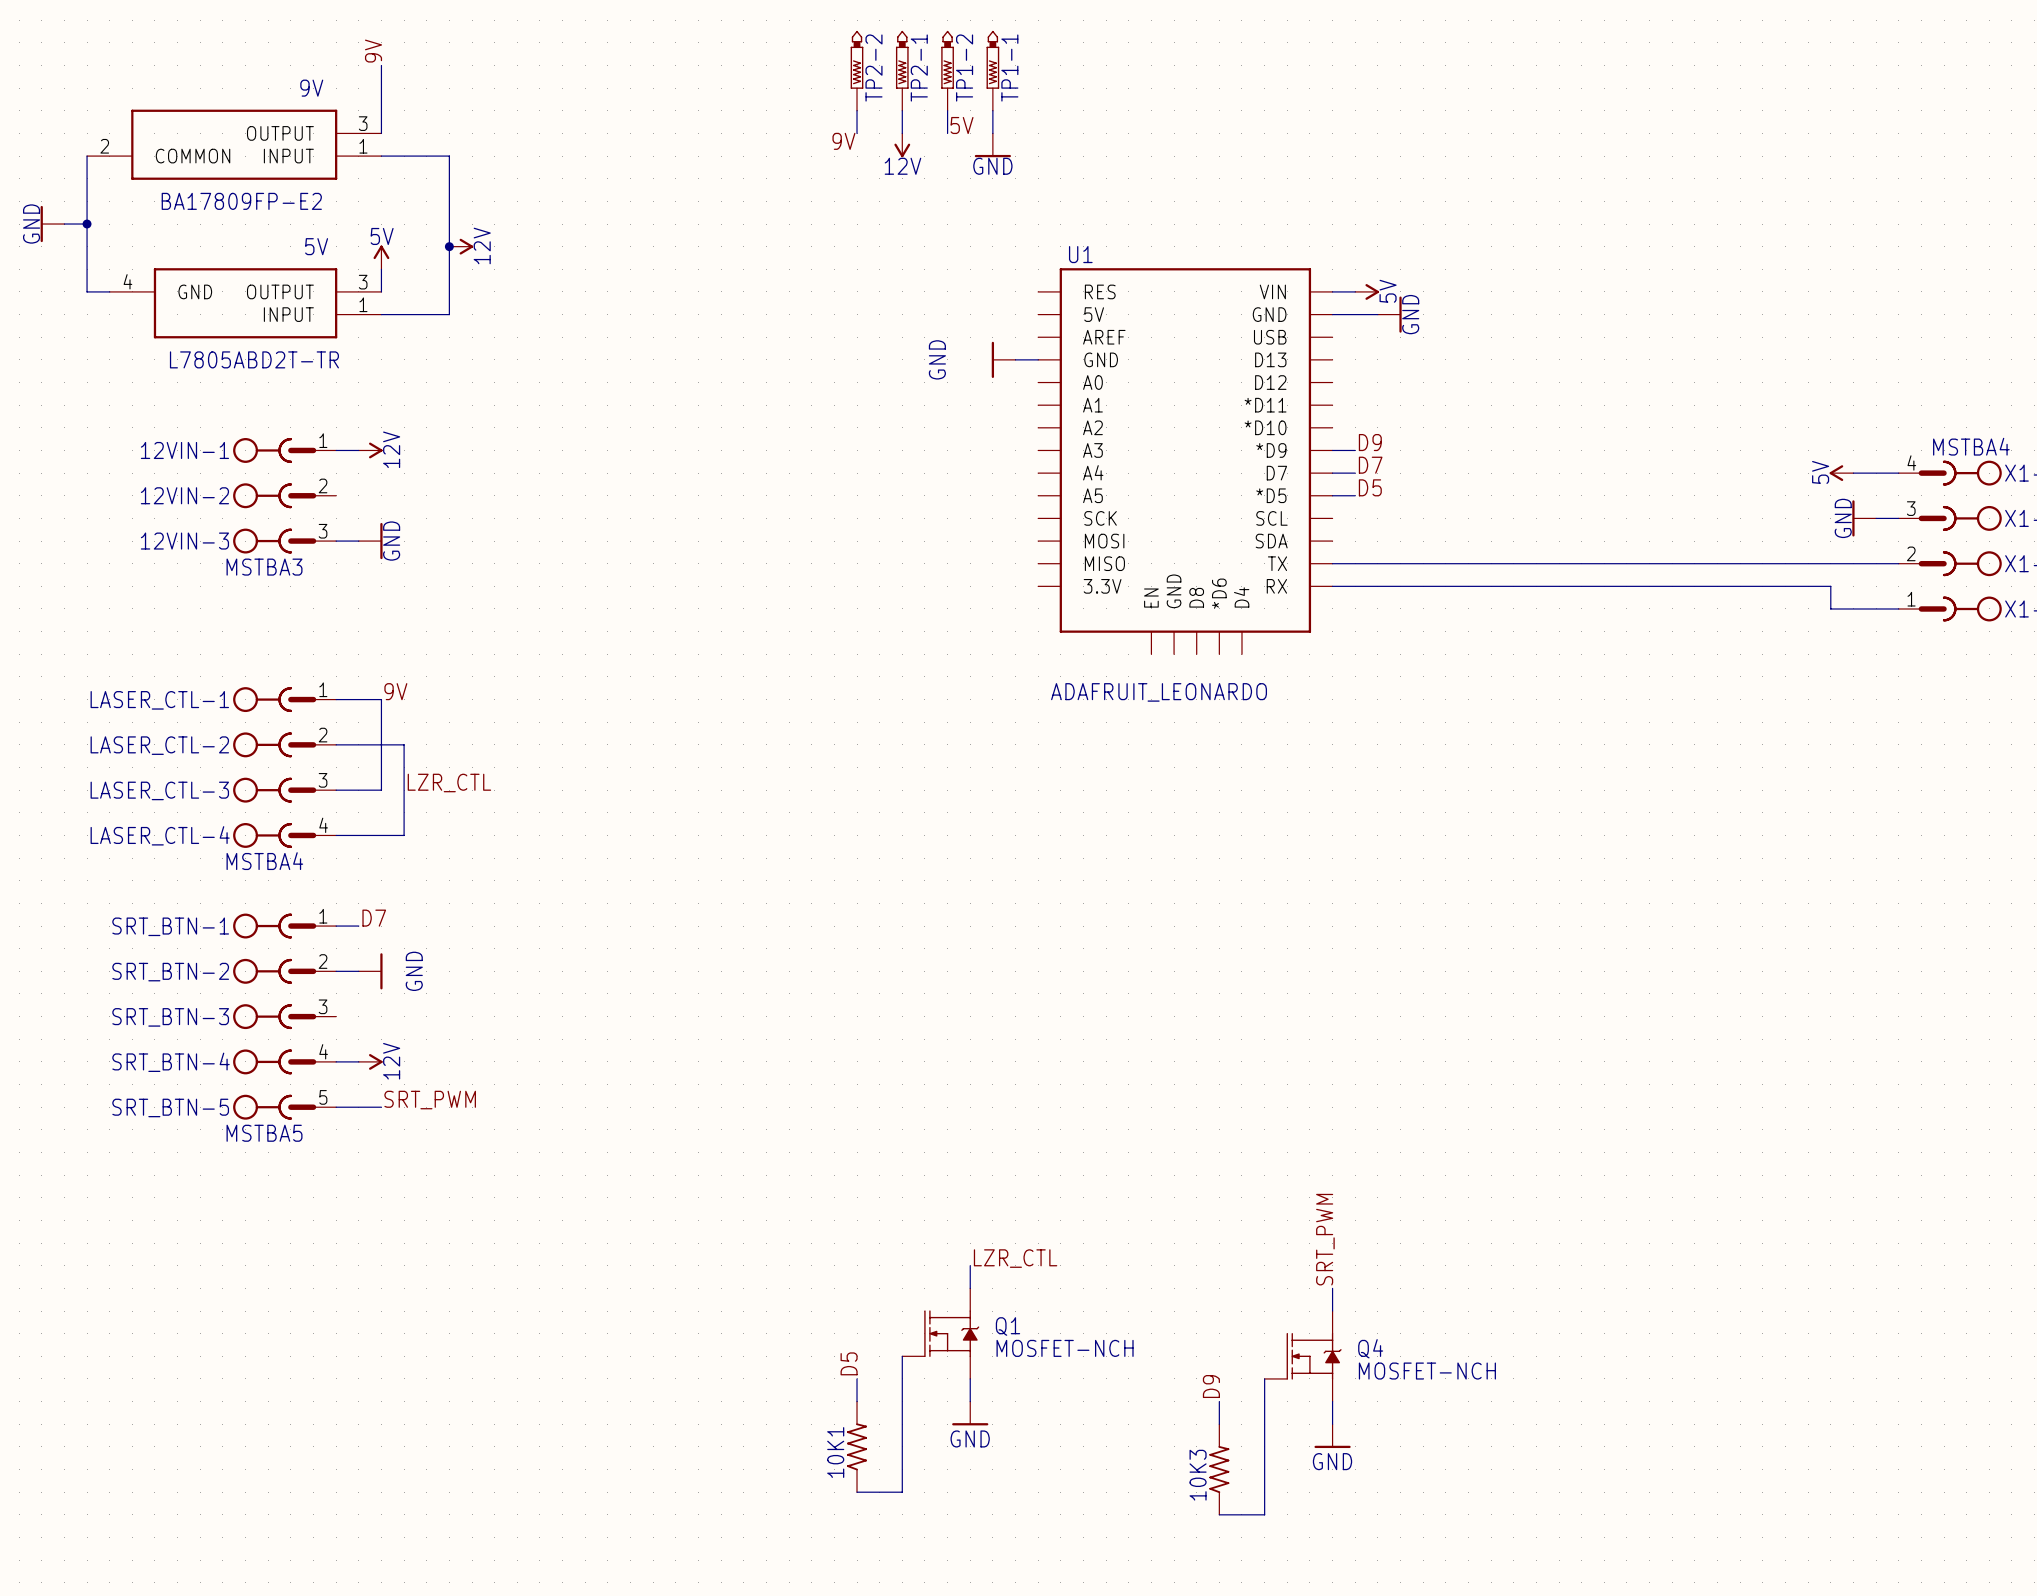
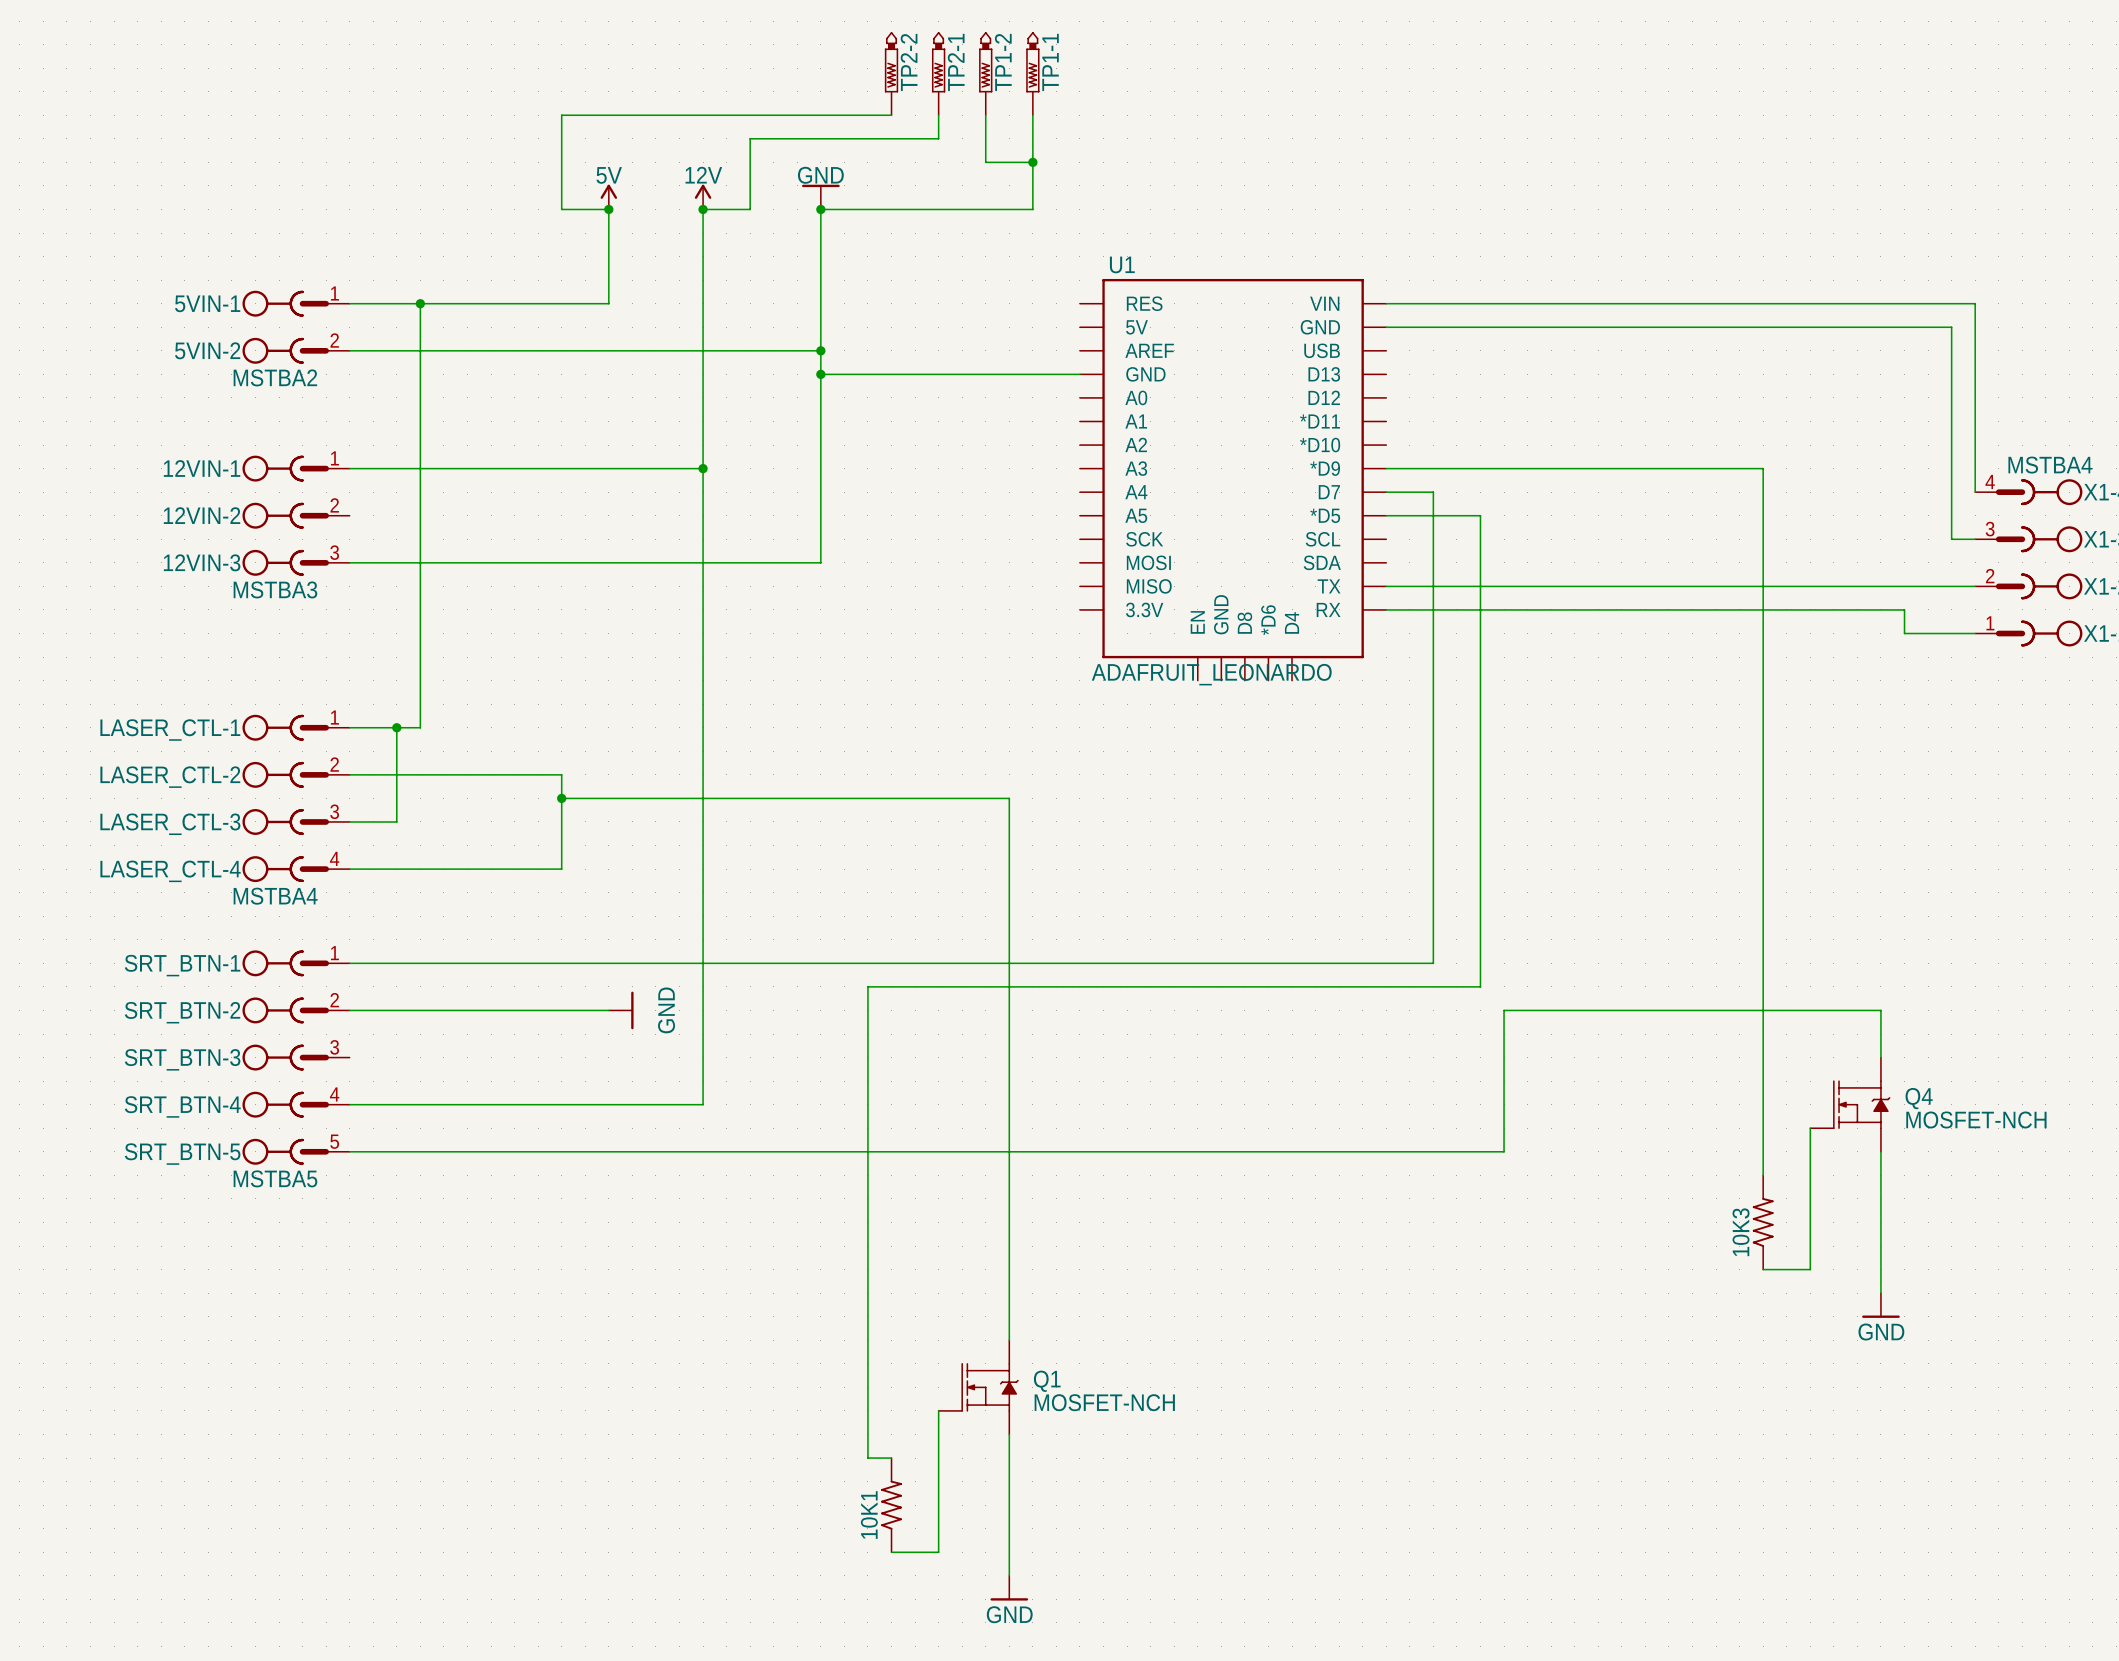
label: 9V (373, 51) -> none
wire: (381, 65) (381, 133) -> none
wire: (857, 110) (857, 133) -> (891, 115) (561, 115) (561, 209) (608, 209) (608, 303) (349, 303)
label: 5V (962, 125) -> none
wire: none -> (938, 138) (750, 138) (750, 209) (703, 209) (703, 1104) (373, 1104)
wire: none -> (985, 138) (985, 162) (1032, 162)
wire: none -> (1032, 138) (1032, 209) (820, 209) (820, 562) (373, 562)
label: 9V (843, 141) -> none
9V: BA17809FP-E2 (234, 144) -> none
power symbol: 12V (902, 145) -> none
power symbol: GND (992, 145) -> none
wire: (87, 156) (87, 291) (109, 291) -> none
wire: (381, 156) (449, 156) (449, 314) (381, 314) -> none
junction: none -> (1032, 162)
power symbol: none -> 12V (703, 197)
power symbol: none -> GND (820, 197)
junction: none -> (608, 209)
junction: none -> (703, 209)
junction: none -> (820, 209)
power symbol: GND (52, 224) -> none
wire: (64, 224) (87, 224) -> none
junction: (87, 224) -> none
junction: (449, 246) -> none
power symbol: 12V (461, 246) -> none
power symbol position: 5V (381, 257) -> 5V (608, 197)
wire: (381, 269) (381, 291) -> none
5VIN-1: none -> (296, 303)
wire: none -> (420, 303) (420, 727) (396, 727)
junction: none -> (420, 303)
power symbol: 5V (1367, 291) -> none
5V: L7805ABD2T-TR (245, 303) -> none
wire: none -> (1433, 327) (1951, 327) (1951, 539)
power symbol: GND (1389, 314) -> none
5VIN-2: none -> MSTBA2 (296, 350)
wire: none -> (349, 350) (820, 350)
junction: none -> (820, 350)
wire: none -> (820, 374) (1056, 374)
junction: none -> (820, 374)
power symbol: GND (1003, 359) -> none
label: D9 (1370, 442) -> none
wire: none -> (373, 468) (703, 468)
power symbol: 12V (370, 450) -> none
junction: none -> (703, 468)
wire: none -> (1409, 468) (1763, 468) (1763, 1175)
label: D7 (1370, 465) -> none
wire: none -> (1409, 492) (1433, 492) (1433, 963) (373, 963)
power symbol: 5V (1841, 473) -> none
wire: (1853, 473) (1898, 473) -> (1409, 303) (1975, 303) (1975, 492)
label: D5 (1370, 487) -> none
power symbol: GND (1864, 518) -> none
power symbol: GND (370, 541) -> none
label: 9V (395, 691) -> none
U1 value position: ADAFRUIT_LEONARDO (1159, 692) -> ADAFRUIT_LEONARDO (1211, 674)
junction: none -> (396, 727)
wire: (404, 744) (404, 835) -> (420, 774) (561, 774) (561, 869) (420, 869)
wire: none -> (561, 798) (1009, 798) (1009, 1316)
junction: none -> (561, 798)
label: LZR_CTL (449, 782) -> none
label: D7 (374, 918) -> none
wire: none -> (373, 1010) (608, 1010)
power symbol: GND (370, 971) -> none
power symbol: none -> GND (621, 1010)
wire: none -> (1880, 1057) (1880, 1010) (1504, 1010) (1504, 1151) (396, 1151)
power symbol: 12V (370, 1061) -> none
wire: none -> (1810, 1128) (1810, 1269) (1763, 1269)
label: SRT_PWM (430, 1100) -> none
wire: none -> (1880, 1151) (1880, 1293)
label: SRT_PWM (1325, 1239) -> none
power symbol: none -> GND (1880, 1305)
label: LZR_CTL (1015, 1258) -> none
wire: (1332, 1288) (1332, 1311) -> none
Q4 position: (1303, 1356) -> (1850, 1104)
label: D5 (849, 1363) -> none
wire: (857, 1378) (857, 1401) -> (1409, 515) (1480, 515) (1480, 986) (867, 986) (867, 1458) (891, 1458)
wire: (1264, 1378) (1264, 1514) (1219, 1514) -> none
label: D9 (1211, 1386) -> none
wire: none -> (1009, 1458) (1009, 1575)
wire: (1219, 1401) (1219, 1424) -> none
wire: (1332, 1401) (1332, 1424) -> none
power symbol position: GND (970, 1413) -> GND (1009, 1588)
power symbol: GND (1332, 1436) -> none
10K3 position: (1219, 1469) -> (1763, 1222)

